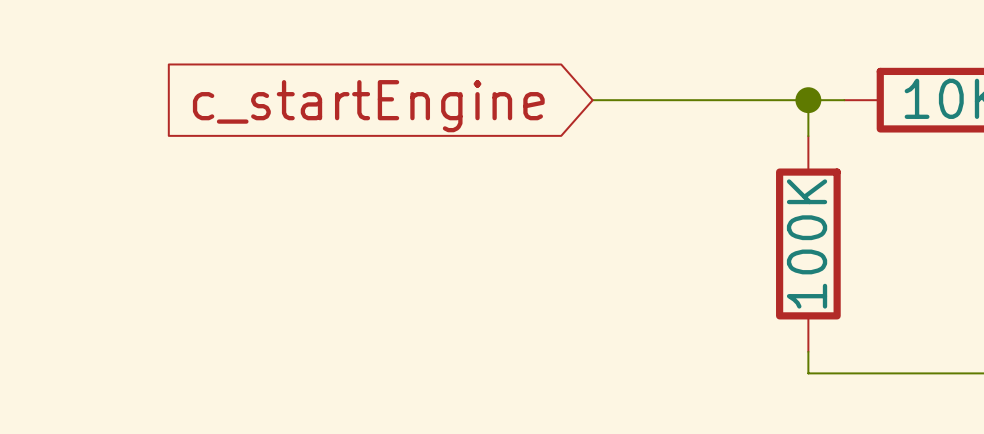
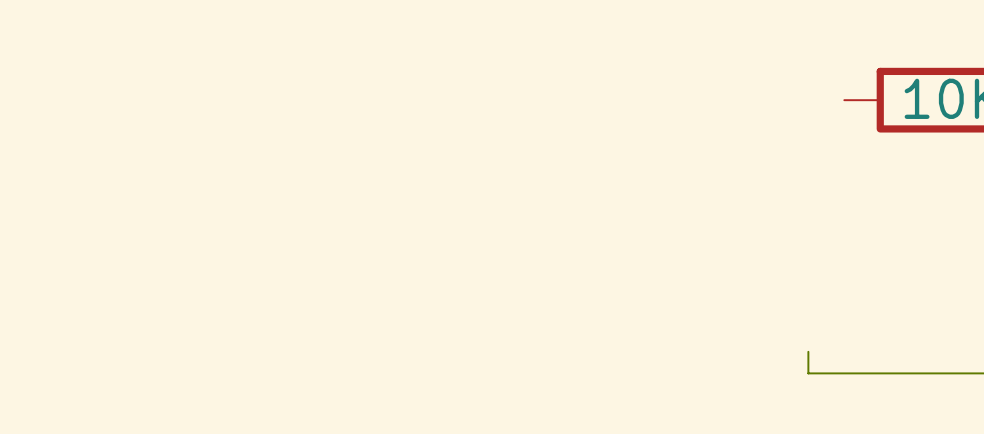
wire: (592, 100) (844, 100) -> none
wire: (808, 100) (808, 136) -> none
junction: (808, 100) -> none
global label: c_startEngine (368, 106) -> none
part: 100K (808, 243) -> none

